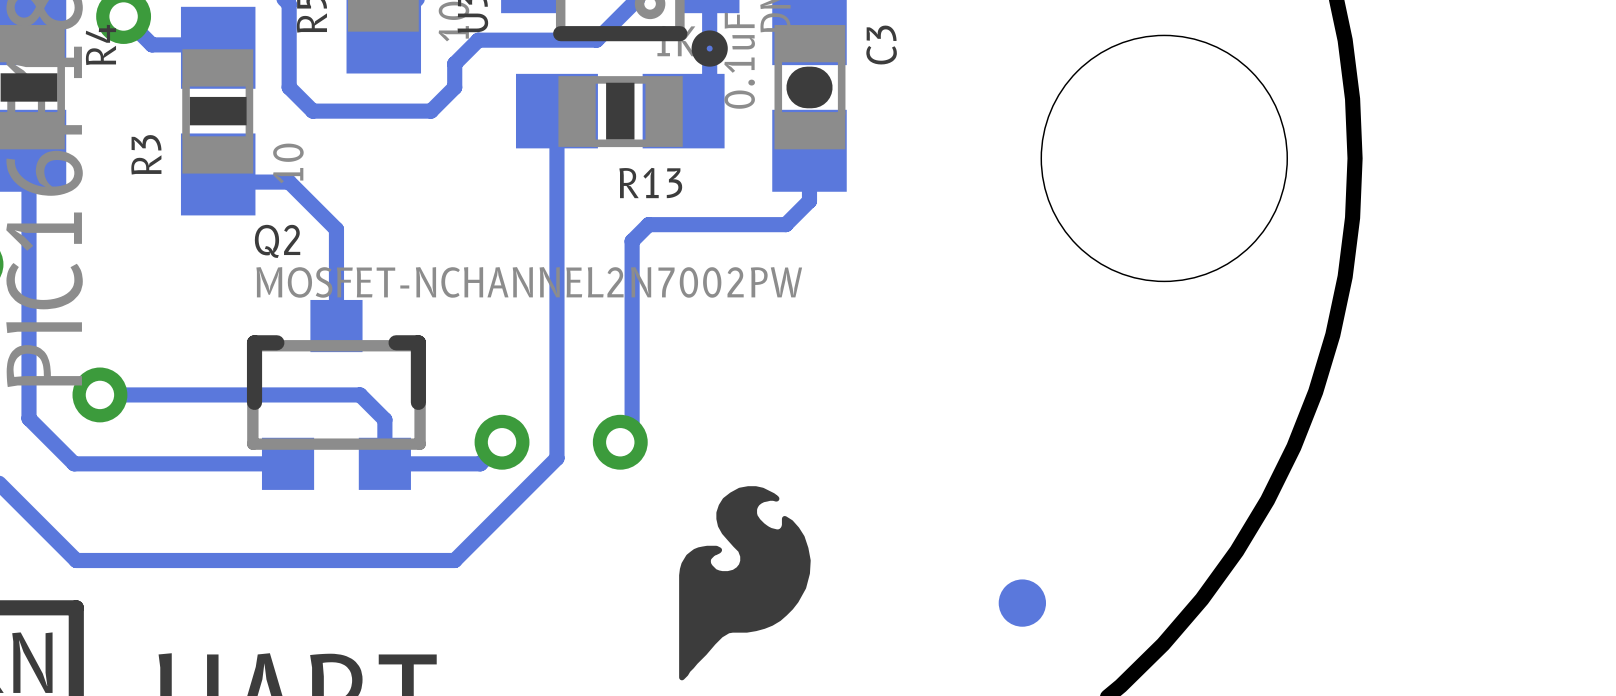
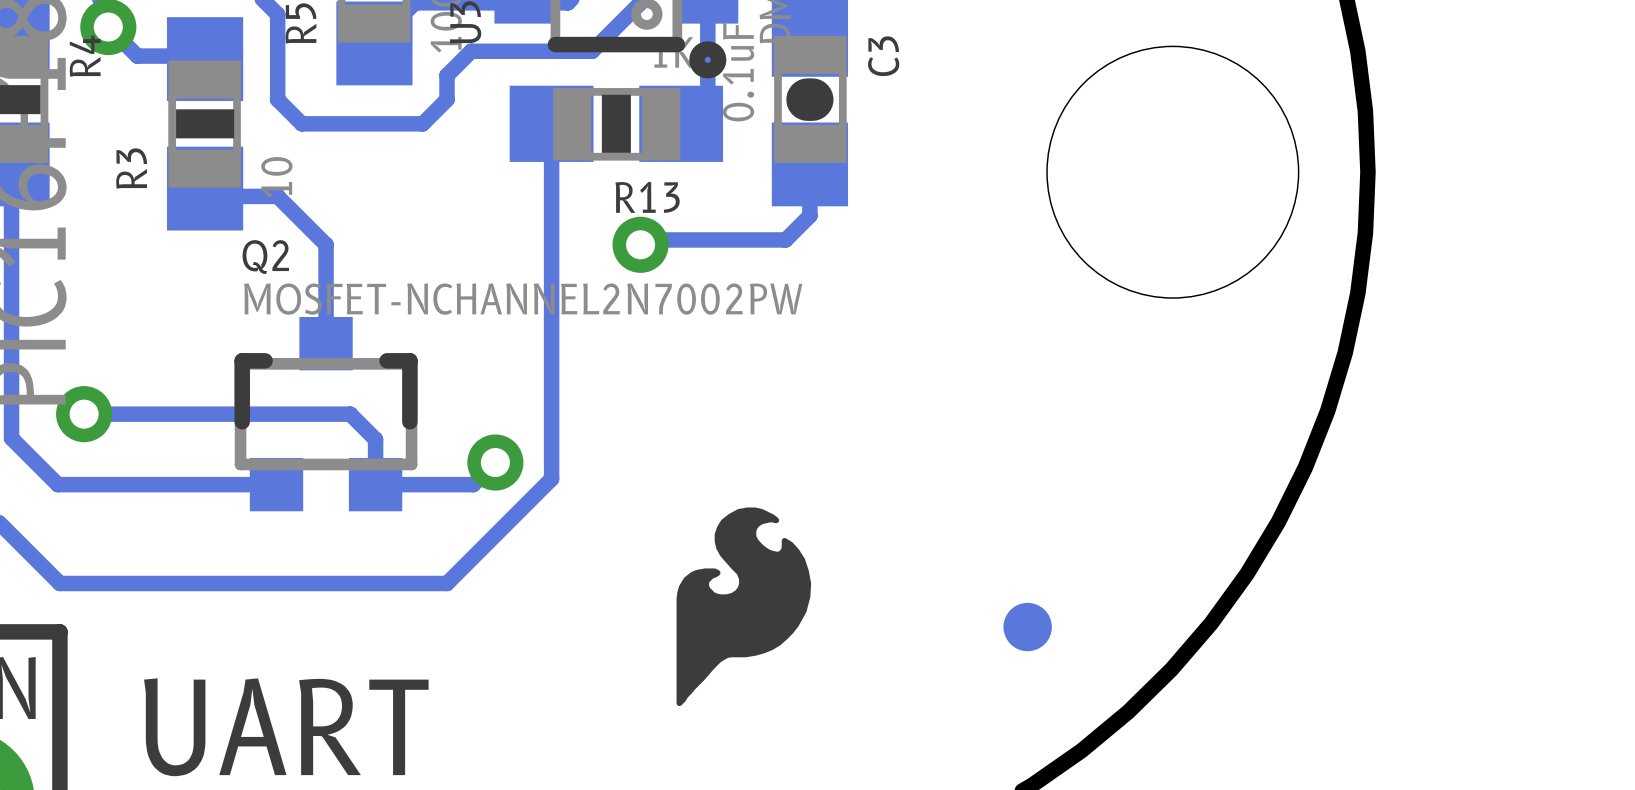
track: (643, 229) (632, 241) (632, 430) (620, 442) -> none
via position: (620, 442) -> (640, 244)

